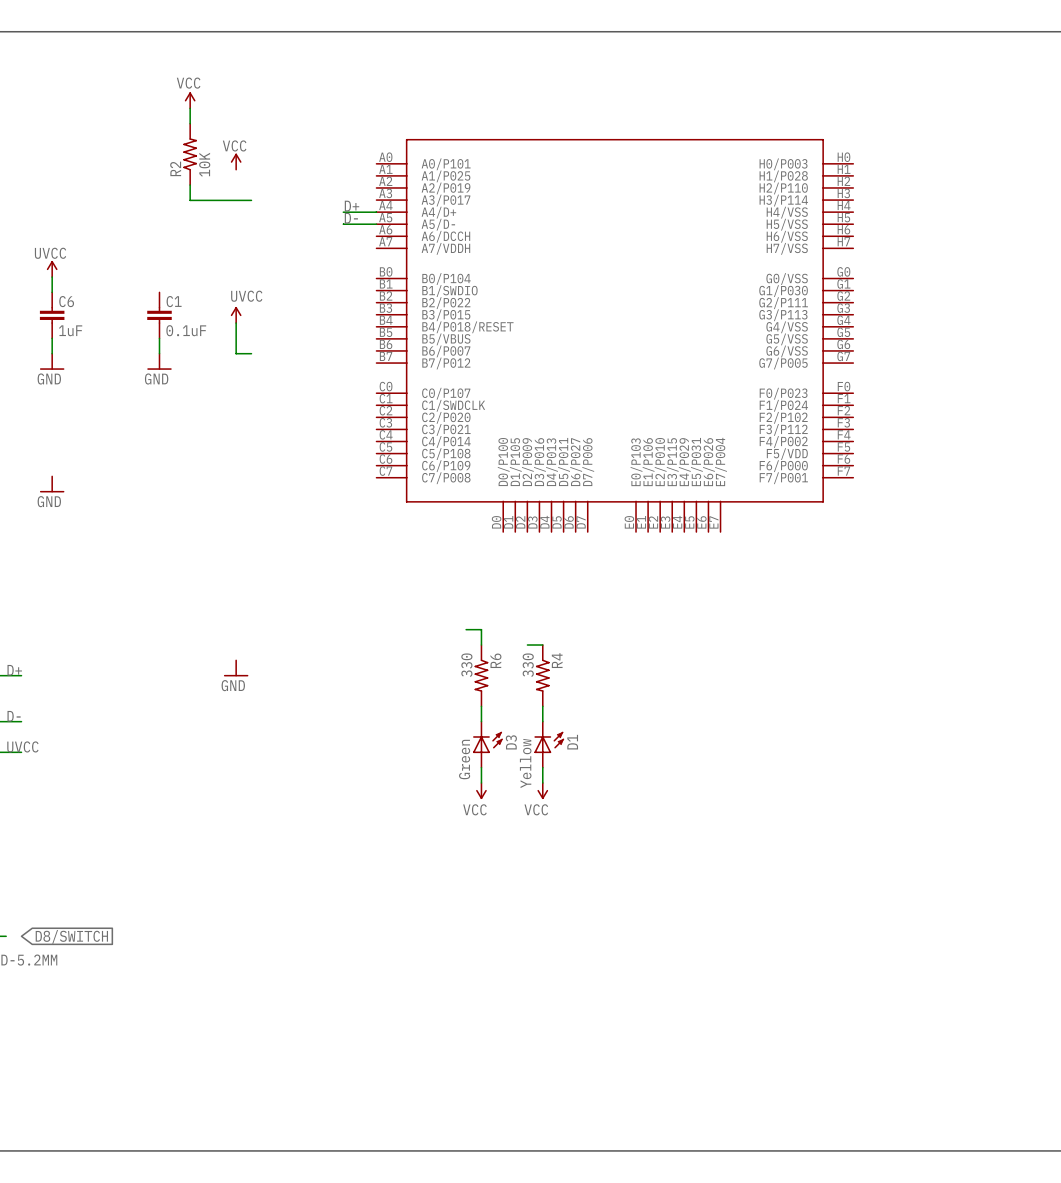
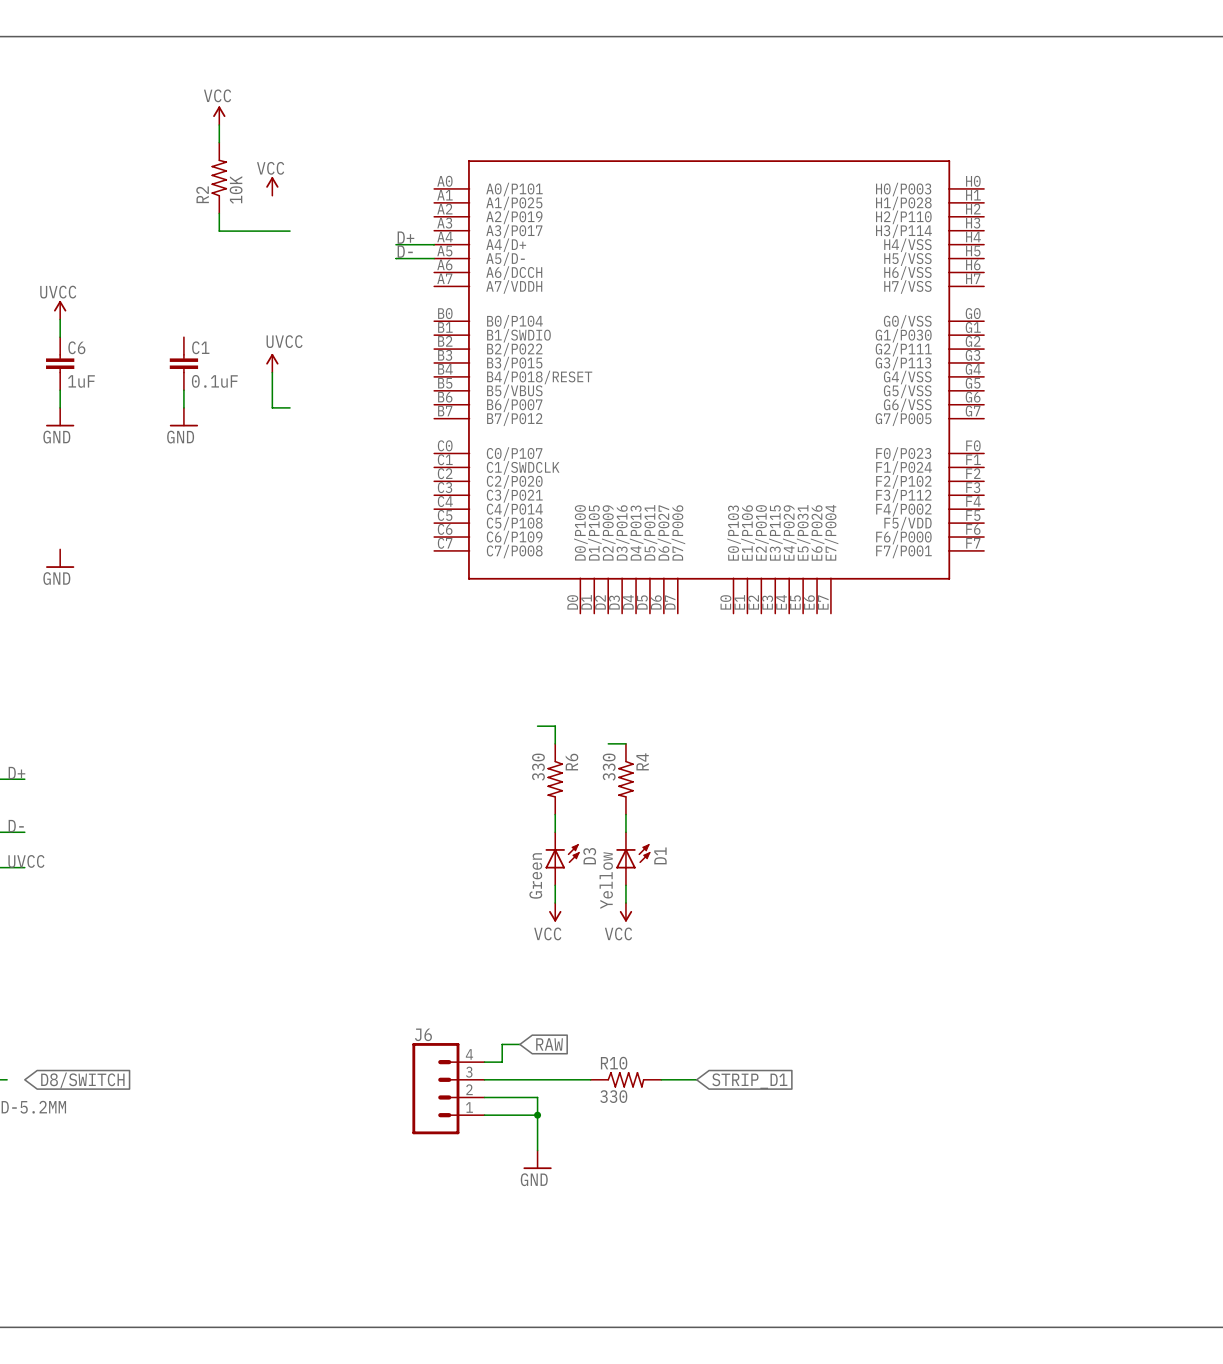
power symbol: GND (236, 668) -> none
wire: none -> (519, 1044) (502, 1044) (502, 1062) (484, 1062)
global label: none -> RAW (549, 1044)
wire: none -> (484, 1079) (590, 1079)
R10: none -> 330 (625, 1079)
wire: none -> (661, 1079) (696, 1079)
global label: none -> STRIP_D1 (749, 1081)
J6: none -> (448, 1088)
wire: none -> (484, 1097) (537, 1097) (537, 1150)
wire: none -> (484, 1115) (537, 1115)
junction: none -> (537, 1115)
power symbol: none -> GND (537, 1159)

